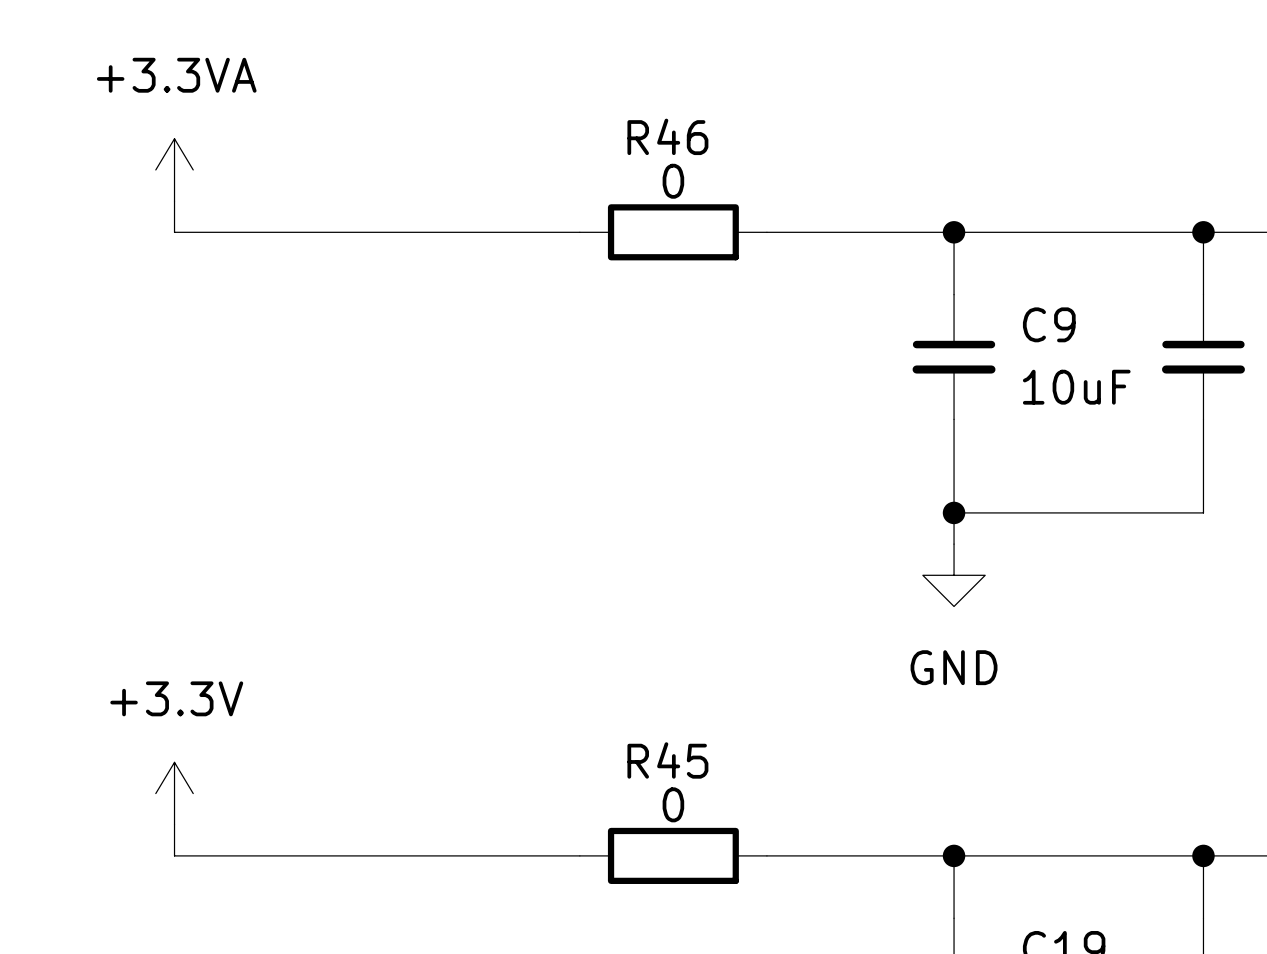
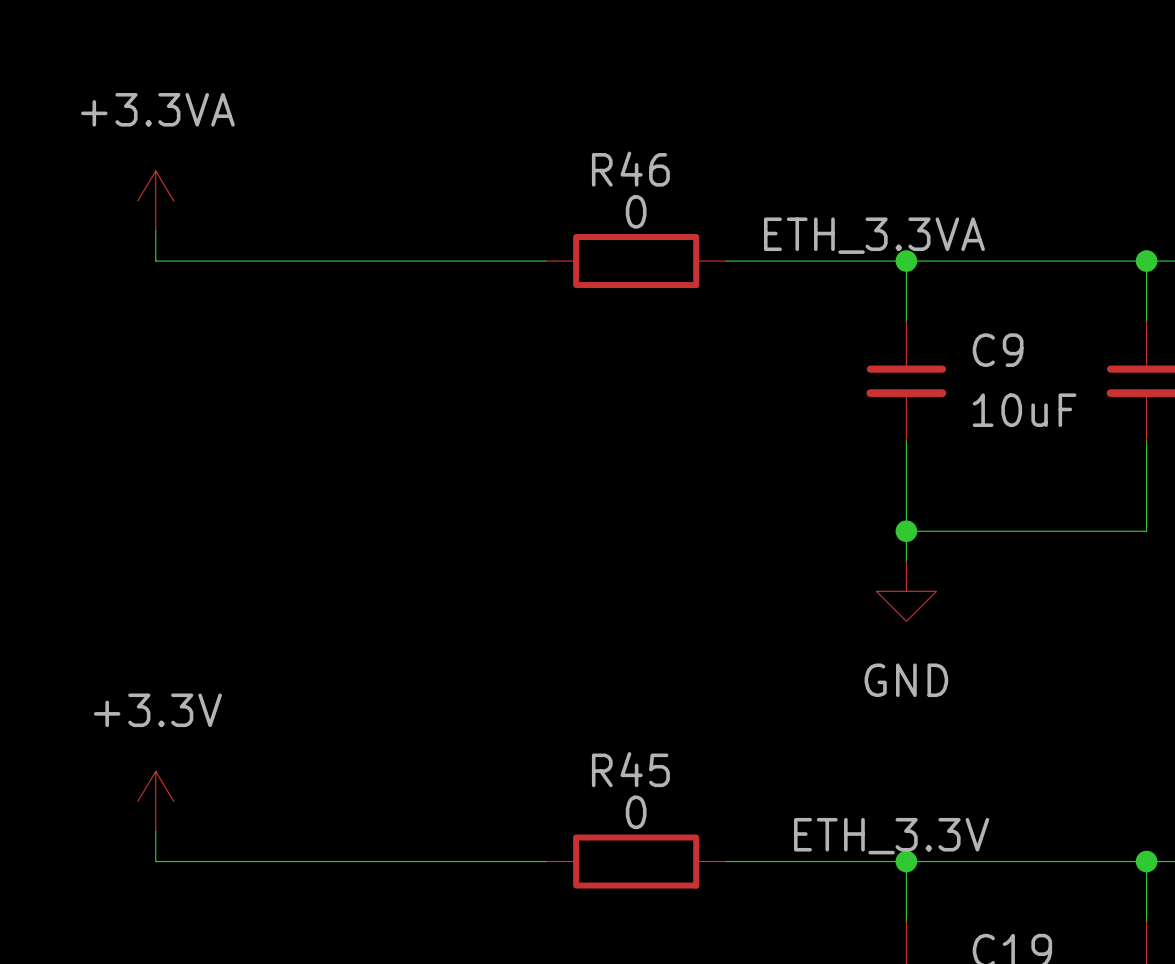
label: none -> ETH_3.3VA (874, 235)
label: none -> ETH_3.3V (891, 836)

